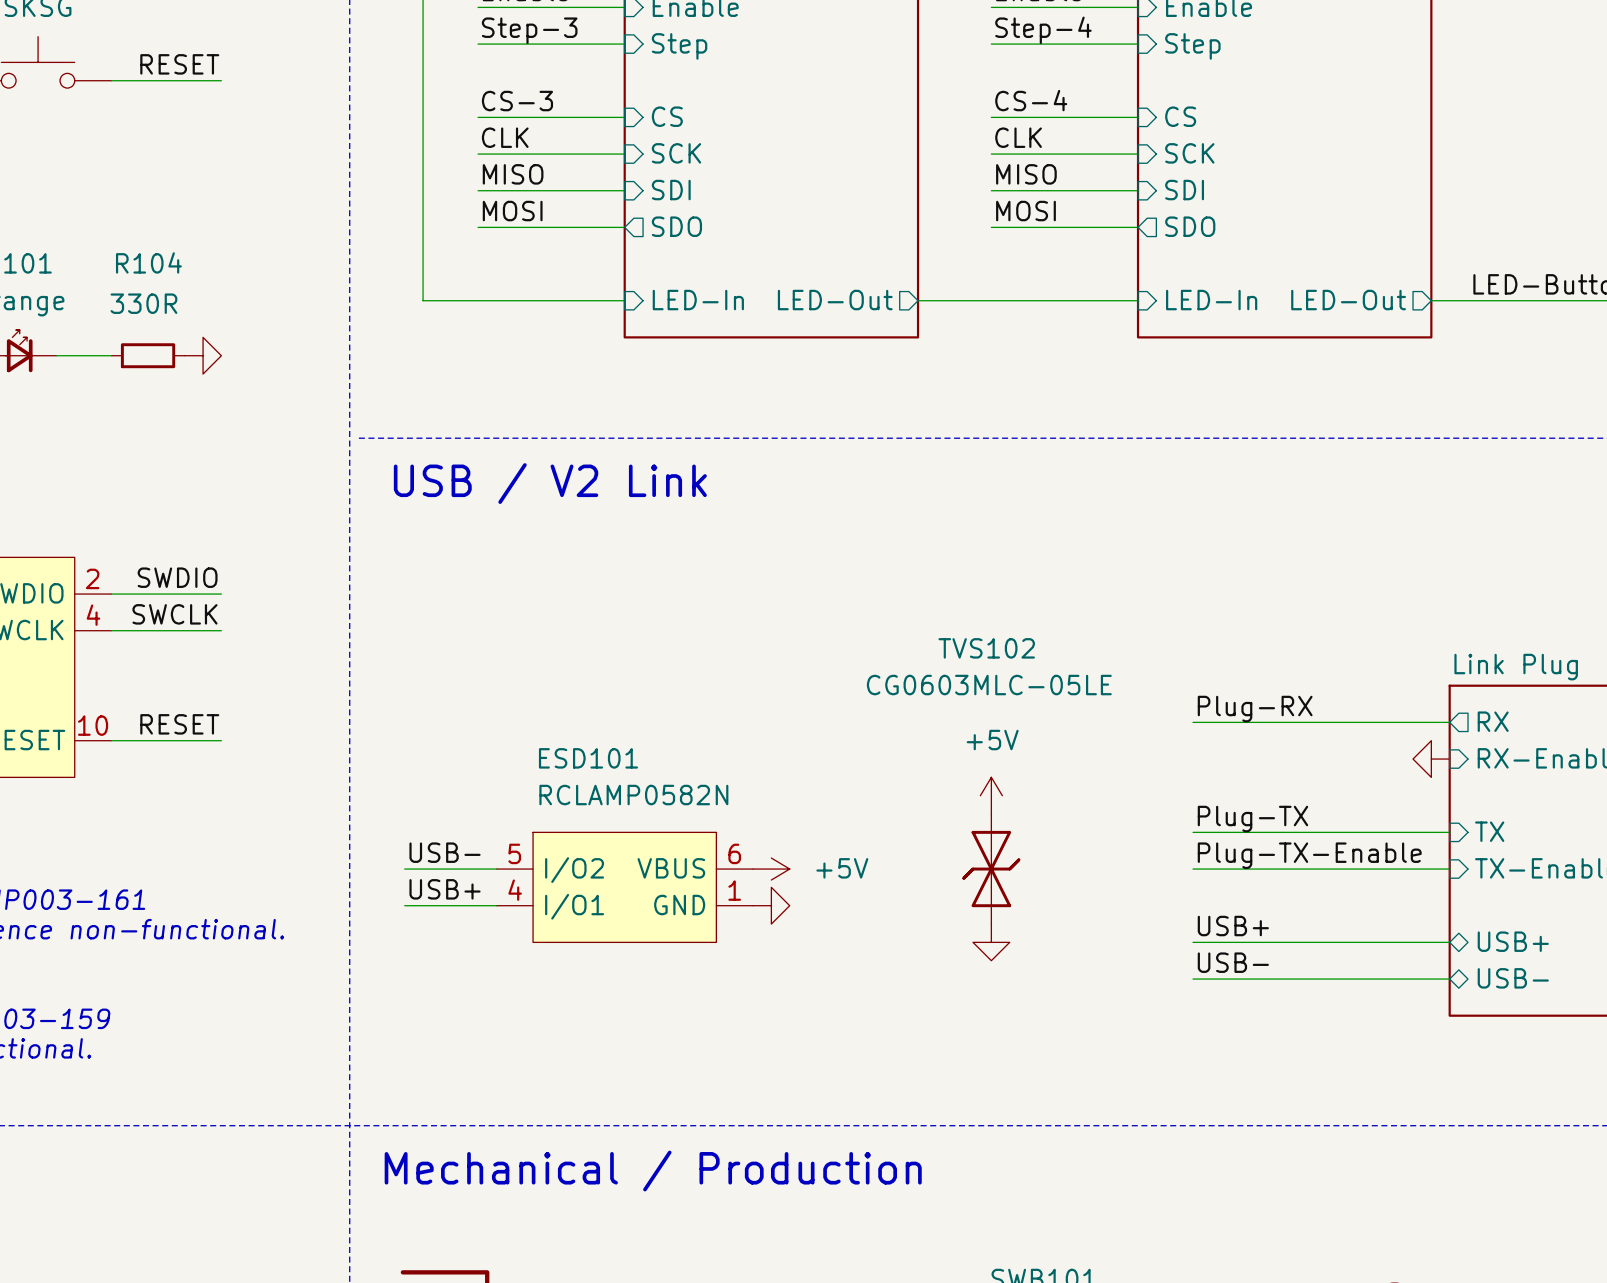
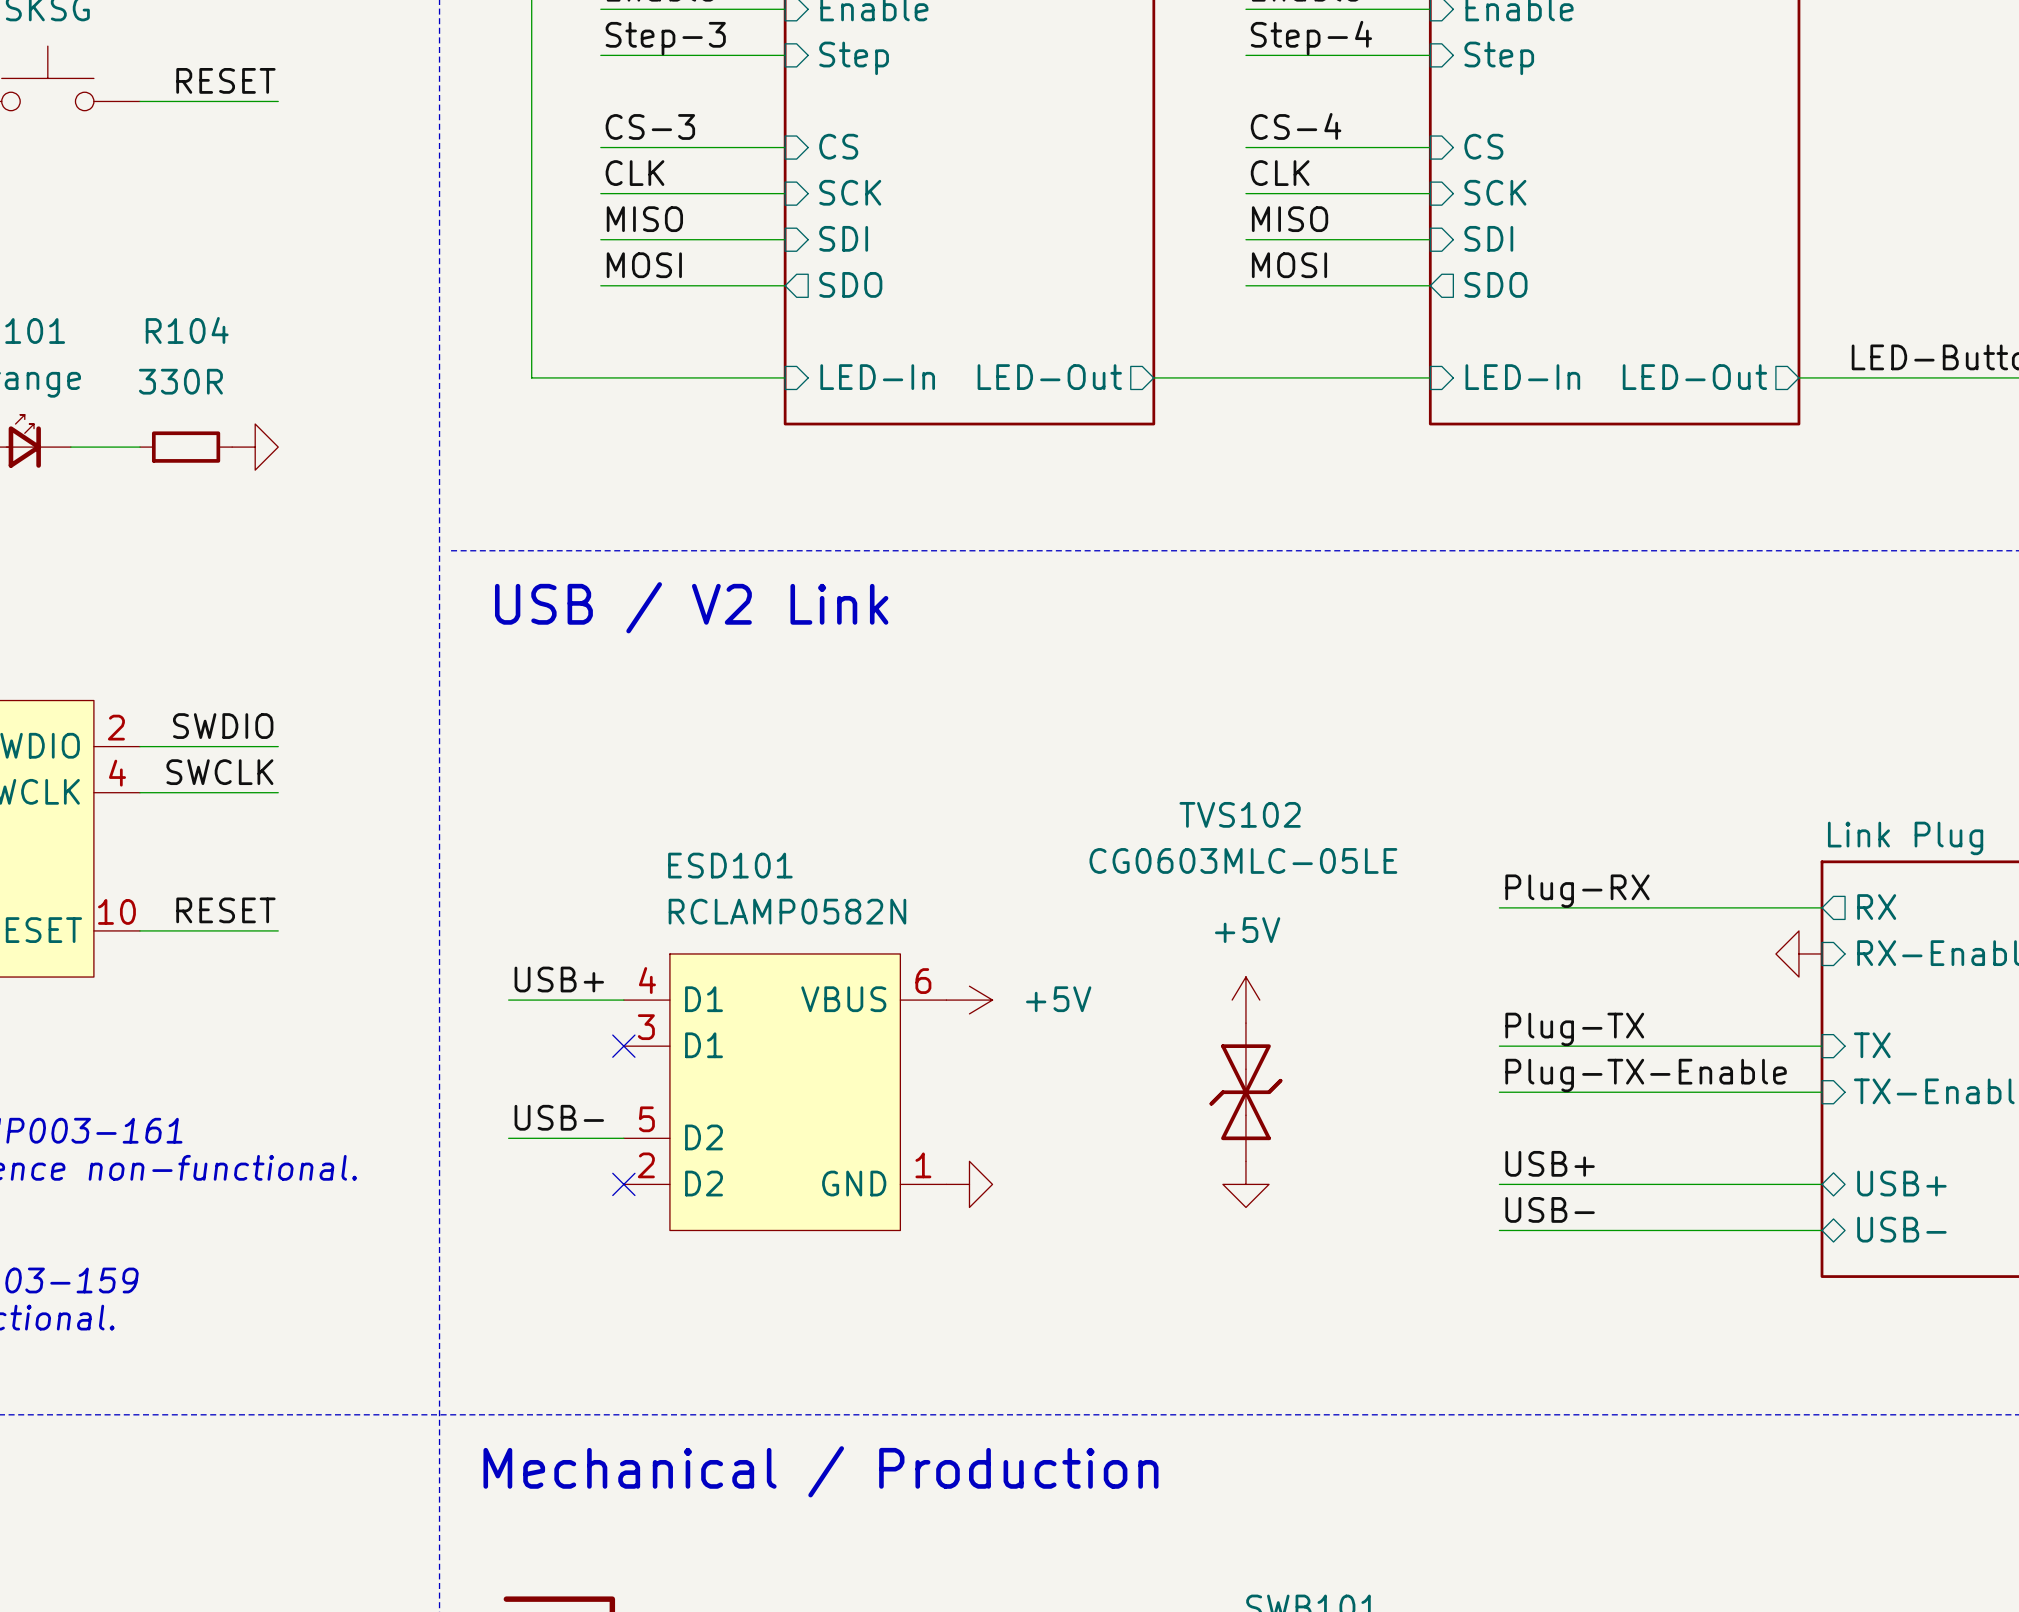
ESD101 name position: ESD101 (588, 758) -> ESD101 (730, 865)
label: none -> USB+ (559, 979)
ESD101 value position: RCLAMP0582N (633, 795) -> RCLAMP0582N (787, 911)
ESD101 symbol: [496, 832, 754, 943] -> [623, 953, 947, 1231]
no-connect mark: none -> (623, 1046)
label: USB- (445, 852) -> none
wire: (404, 869) (496, 869) -> (508, 1000) (623, 1000)
power symbol position: +5V (771, 869) -> +5V (969, 1000)
label: USB+ (445, 889) -> USB- (559, 1117)
power symbol position: (771, 905) -> (969, 1184)
no-connect mark: none -> (623, 1184)

